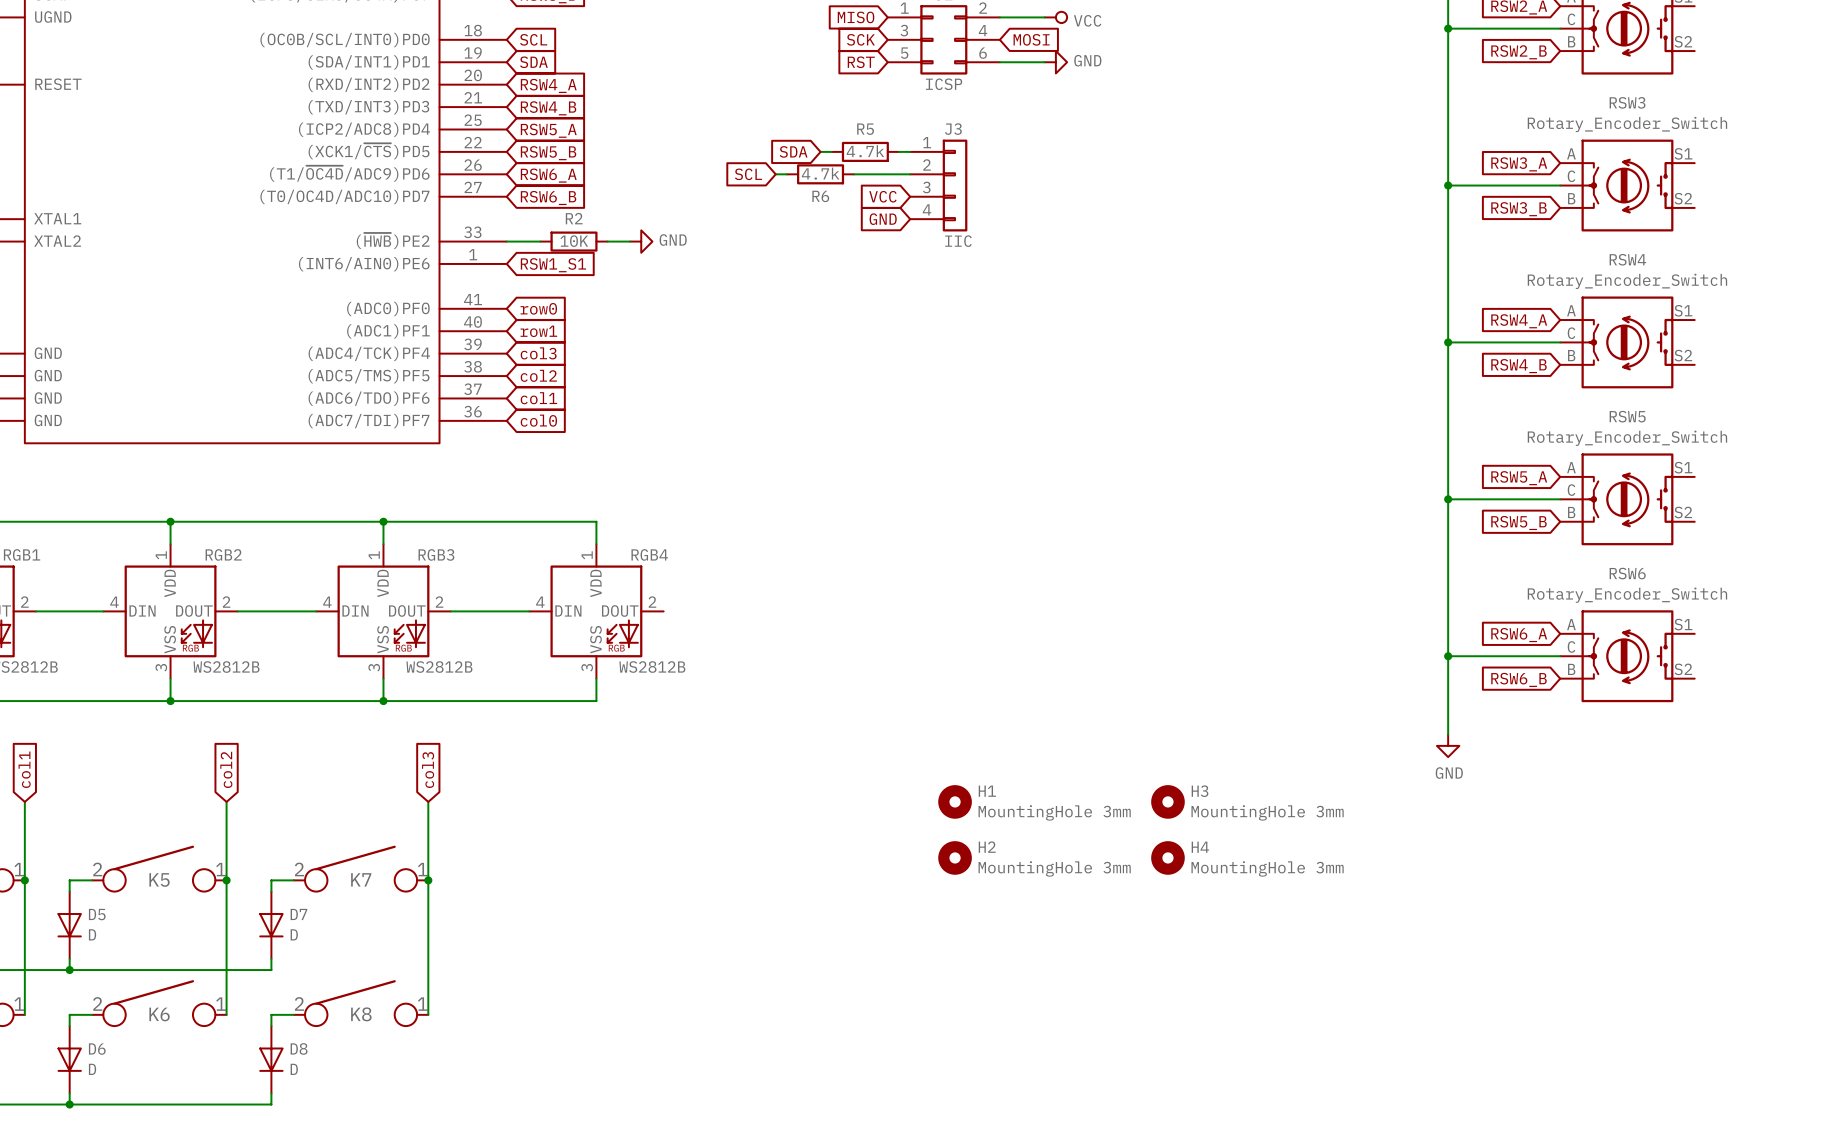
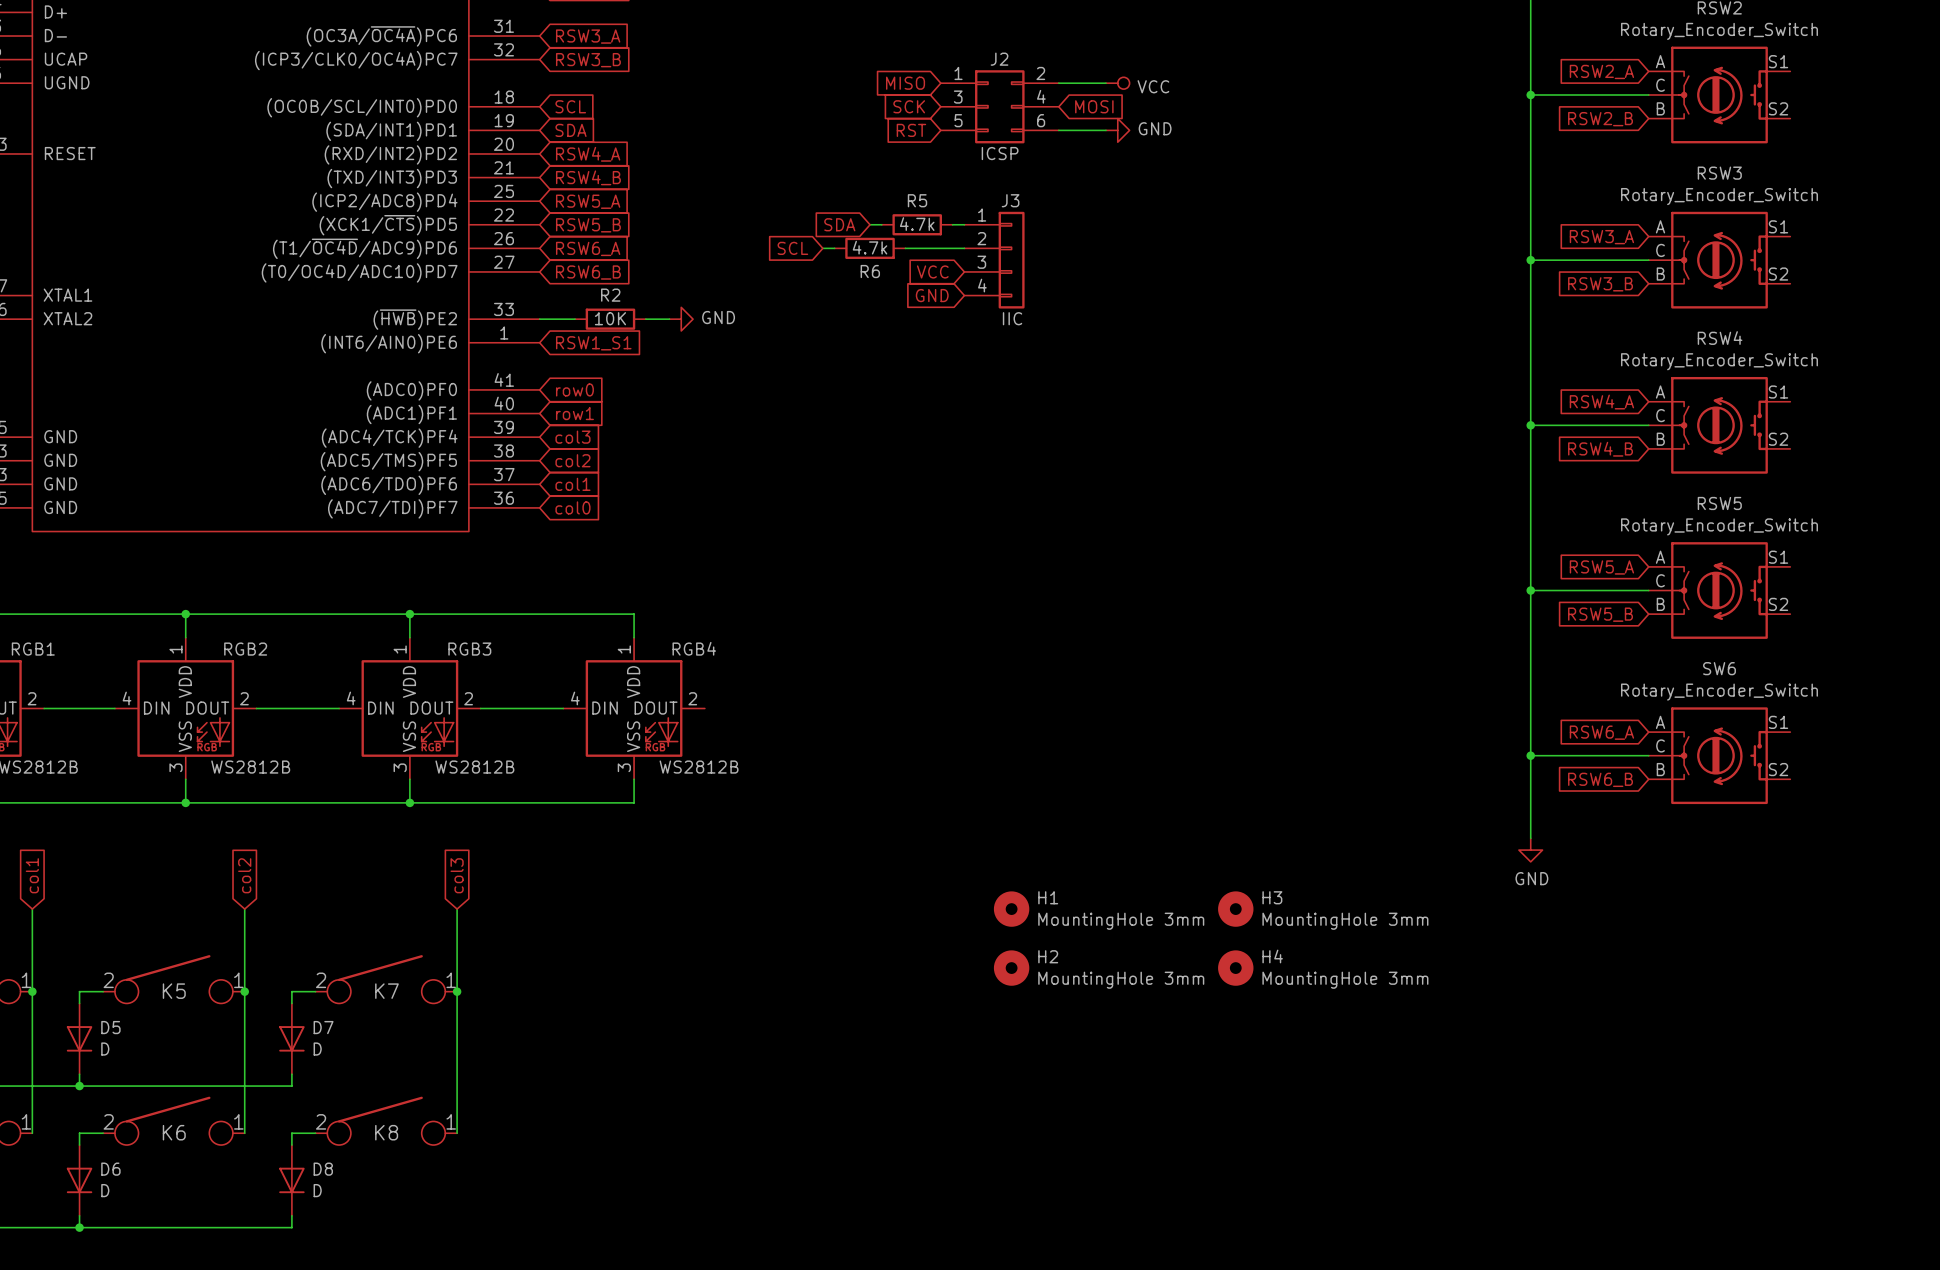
RSW6 name: RSW6 (1627, 573) -> SW6 (1719, 668)

